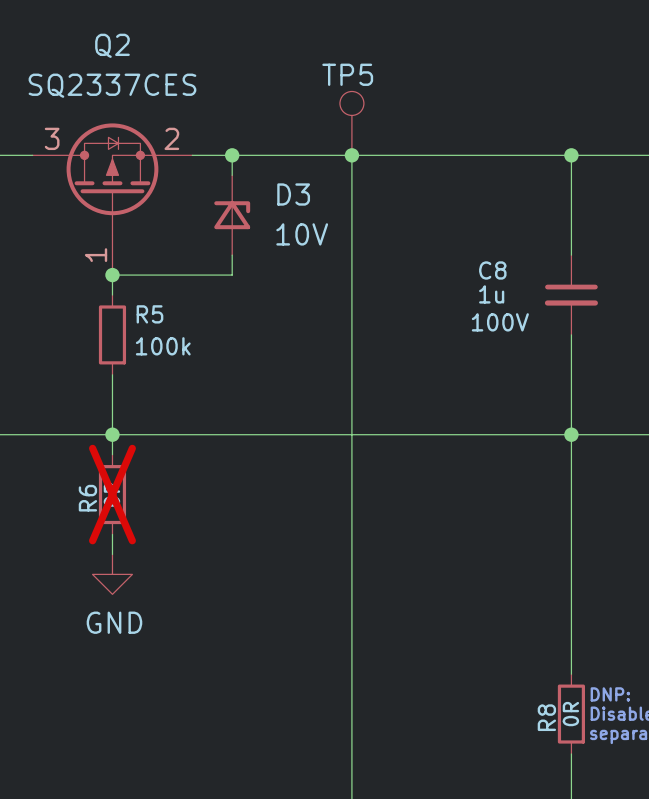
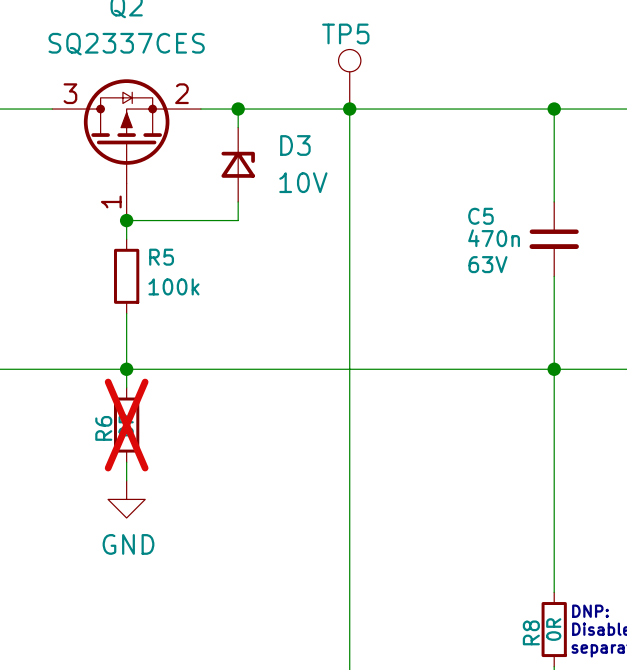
C8 name: C8 (492, 270) -> C5 (480, 216)
C8 value: 1u (491, 294) -> 470n (494, 238)
C8 text: 100V (500, 322) -> 63V (487, 264)

